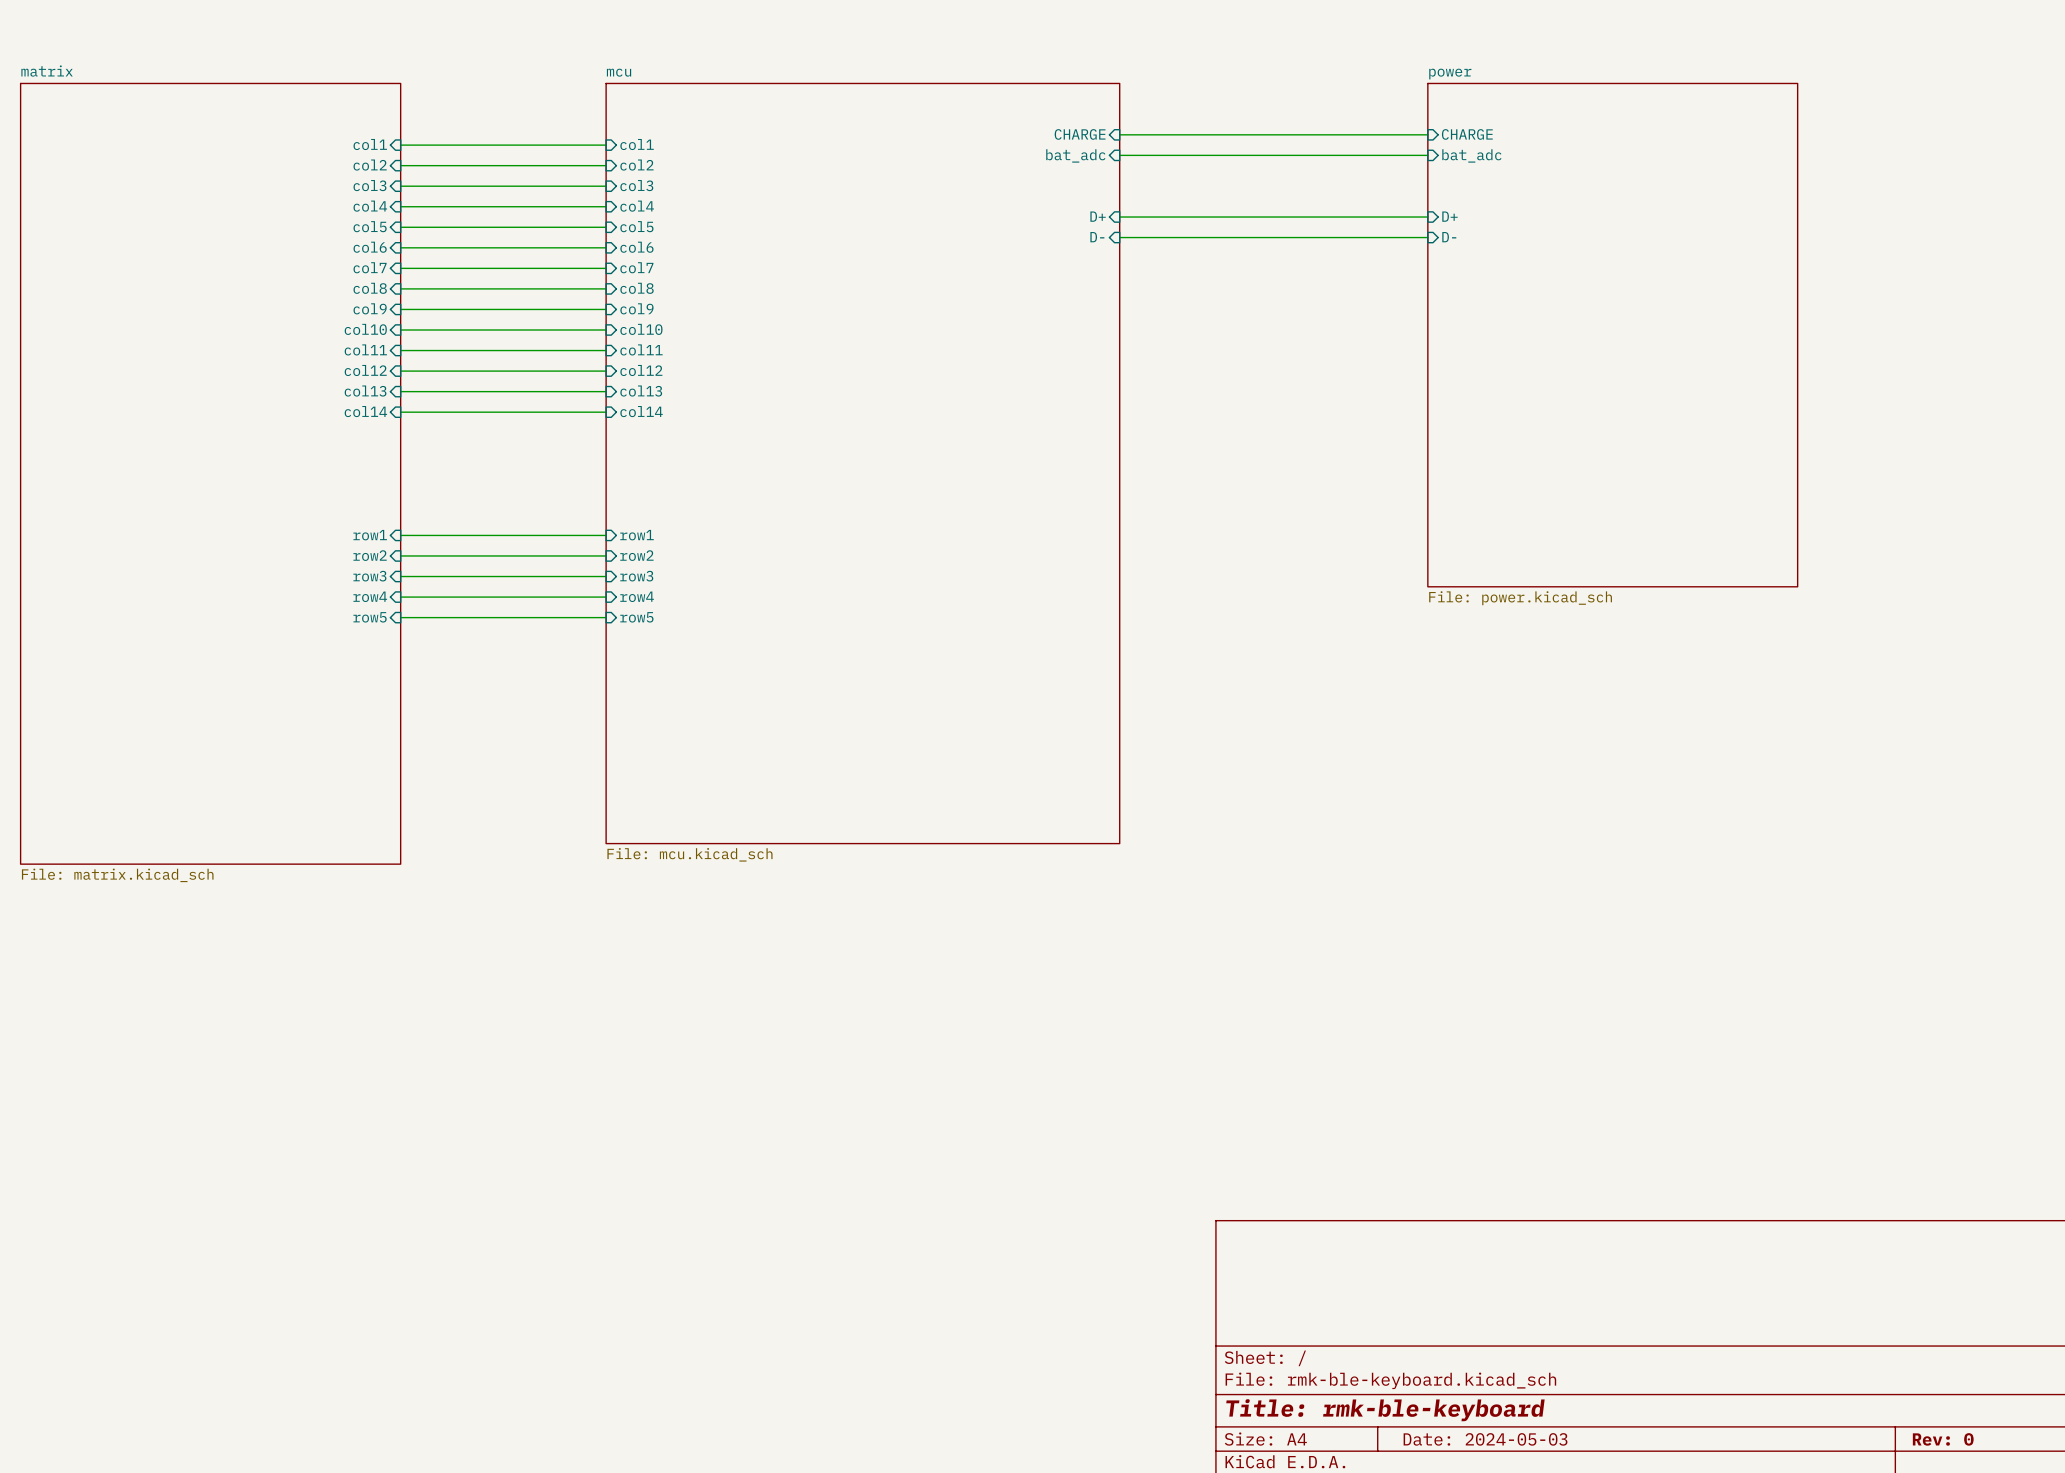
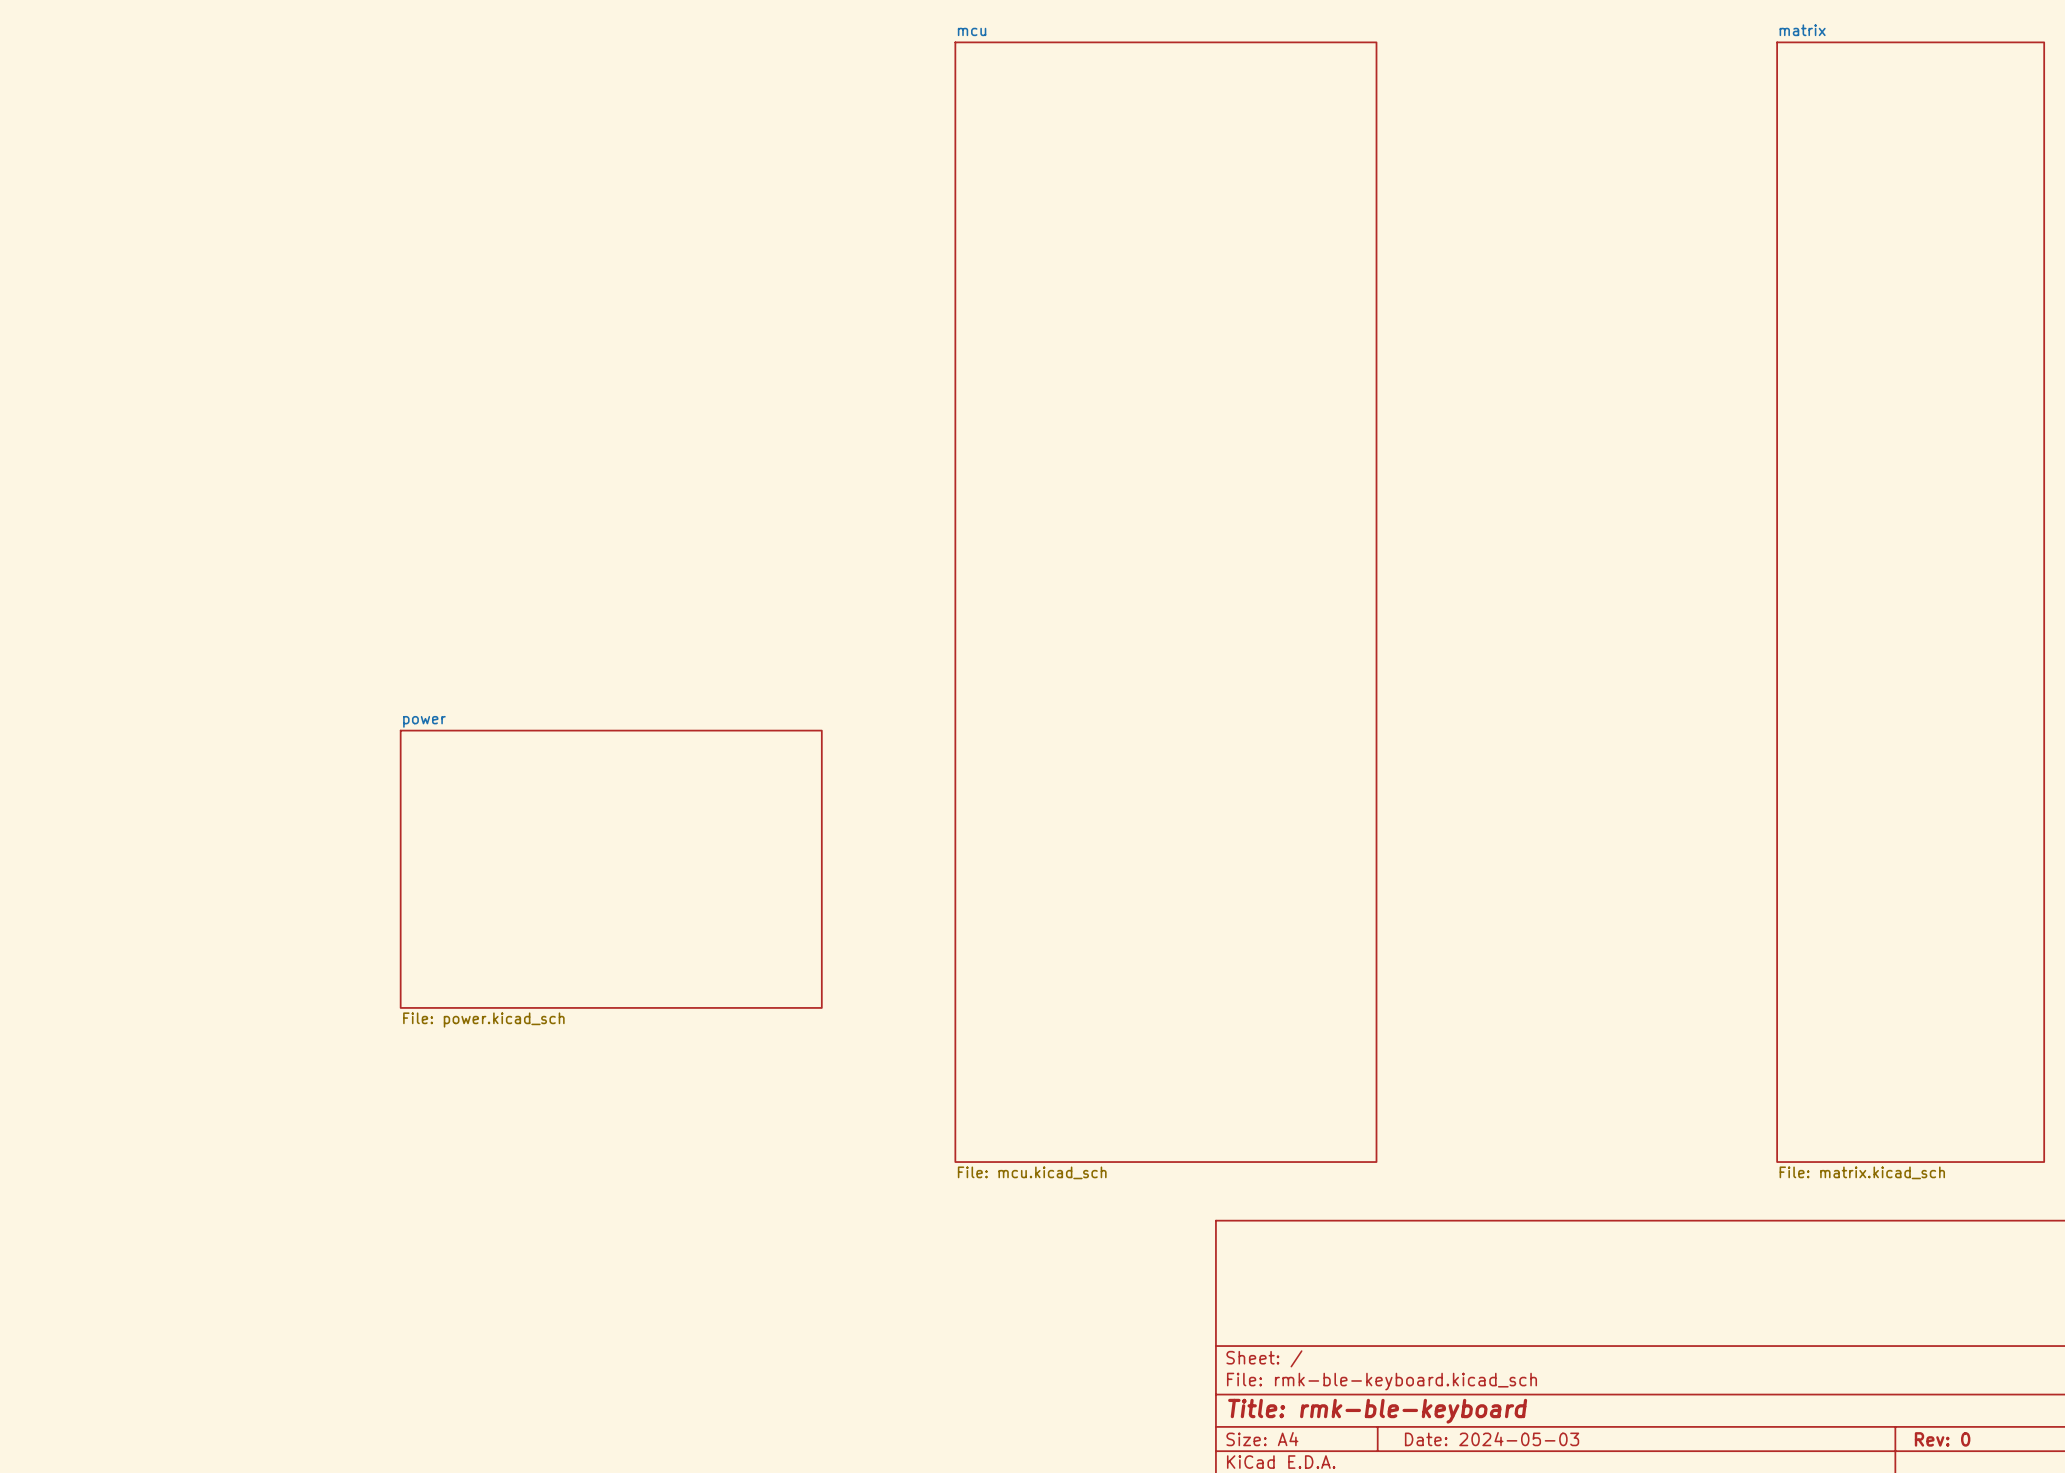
sheet pin: CHARGE (1080, 134) -> none
wire: (1119, 134) (1427, 134) -> none
sheet pin: CHARGE (1467, 134) -> none
sheet pin: col1 (370, 144) -> none
sheet pin: col1 (637, 144) -> none
wire: (400, 145) (606, 145) -> none
sheet pin: bat_adc (1075, 155) -> none
wire: (1119, 155) (1427, 155) -> none
sheet pin: bat_adc (1471, 155) -> none
sheet pin: col2 (370, 165) -> none
wire: (400, 165) (606, 165) -> none
sheet pin: col2 (636, 165) -> none
sheet pin: col3 (369, 185) -> none
sheet pin: col3 (636, 185) -> none
wire: (400, 186) (606, 186) -> none
sheet pin: col4 (370, 206) -> none
wire: (400, 206) (606, 206) -> none
sheet pin: col4 (637, 206) -> none
sheet pin: D+ (1098, 216) -> none
sheet pin: D+ (1449, 216) -> none
wire: (1119, 217) (1427, 217) -> none
sheet pin: col5 (370, 226) -> none
sheet pin: col5 (636, 226) -> none
wire: (400, 227) (606, 227) -> none
sheet pin: D- (1097, 237) -> none
wire: (1119, 237) (1427, 237) -> none
sheet pin: D- (1449, 237) -> none
sheet pin: col6 (370, 247) -> none
wire: (400, 247) (606, 247) -> none
sheet pin: col6 (636, 247) -> none
sheet pin: col7 (370, 267) -> none
sheet pin: col7 (636, 267) -> none
wire: (400, 268) (606, 268) -> none
sheet pin: col8 (370, 288) -> none
wire: (400, 288) (606, 288) -> none
sheet pin: col8 (637, 288) -> none
sheet pin: col9 (370, 308) -> none
sheet pin: col9 (636, 308) -> none
wire: (400, 309) (606, 309) -> none
sheet pin: col10 (365, 329) -> none
sheet pin: col10 (641, 329) -> none
wire: (400, 330) (606, 330) -> none
sheet power: File: power.kicad_sch (1612, 335) -> none
sheet pin: col11 (365, 349) -> none
sheet pin: col11 (641, 349) -> none
wire: (400, 350) (606, 350) -> none
sheet pin: col12 (365, 370) -> none
sheet pin: col12 (641, 370) -> none
wire: (400, 371) (606, 371) -> none
sheet pin: col13 (365, 391) -> none
wire: (400, 391) (606, 391) -> none
sheet pin: col13 (641, 391) -> none
sheet pin: col14 (365, 411) -> none
sheet pin: col14 (641, 411) -> none
wire: (400, 412) (606, 412) -> none
sheet mcu: File: mcu.kicad_sch (862, 463) -> none
sheet matrix: File: matrix.kicad_sch (210, 473) -> none
sheet pin: row1 (370, 535) -> none
wire: (400, 535) (606, 535) -> none
sheet pin: row1 (637, 535) -> none
sheet pin: row2 (370, 555) -> none
wire: (400, 555) (606, 555) -> none
sheet pin: row2 (636, 555) -> none
sheet pin: row3 (369, 576) -> none
wire: (400, 576) (606, 576) -> none
sheet pin: row3 (636, 576) -> none
sheet pin: row4 (370, 596) -> none
sheet pin: row4 (637, 596) -> none
wire: (400, 597) (606, 597) -> none
sheet mcu: none -> File: mcu.kicad_sch (1165, 602)
sheet matrix: none -> File: matrix.kicad_sch (1910, 602)
sheet pin: row5 (370, 617) -> none
wire: (400, 617) (606, 617) -> none
sheet pin: row5 (636, 617) -> none
sheet power: none -> File: power.kicad_sch (611, 869)

